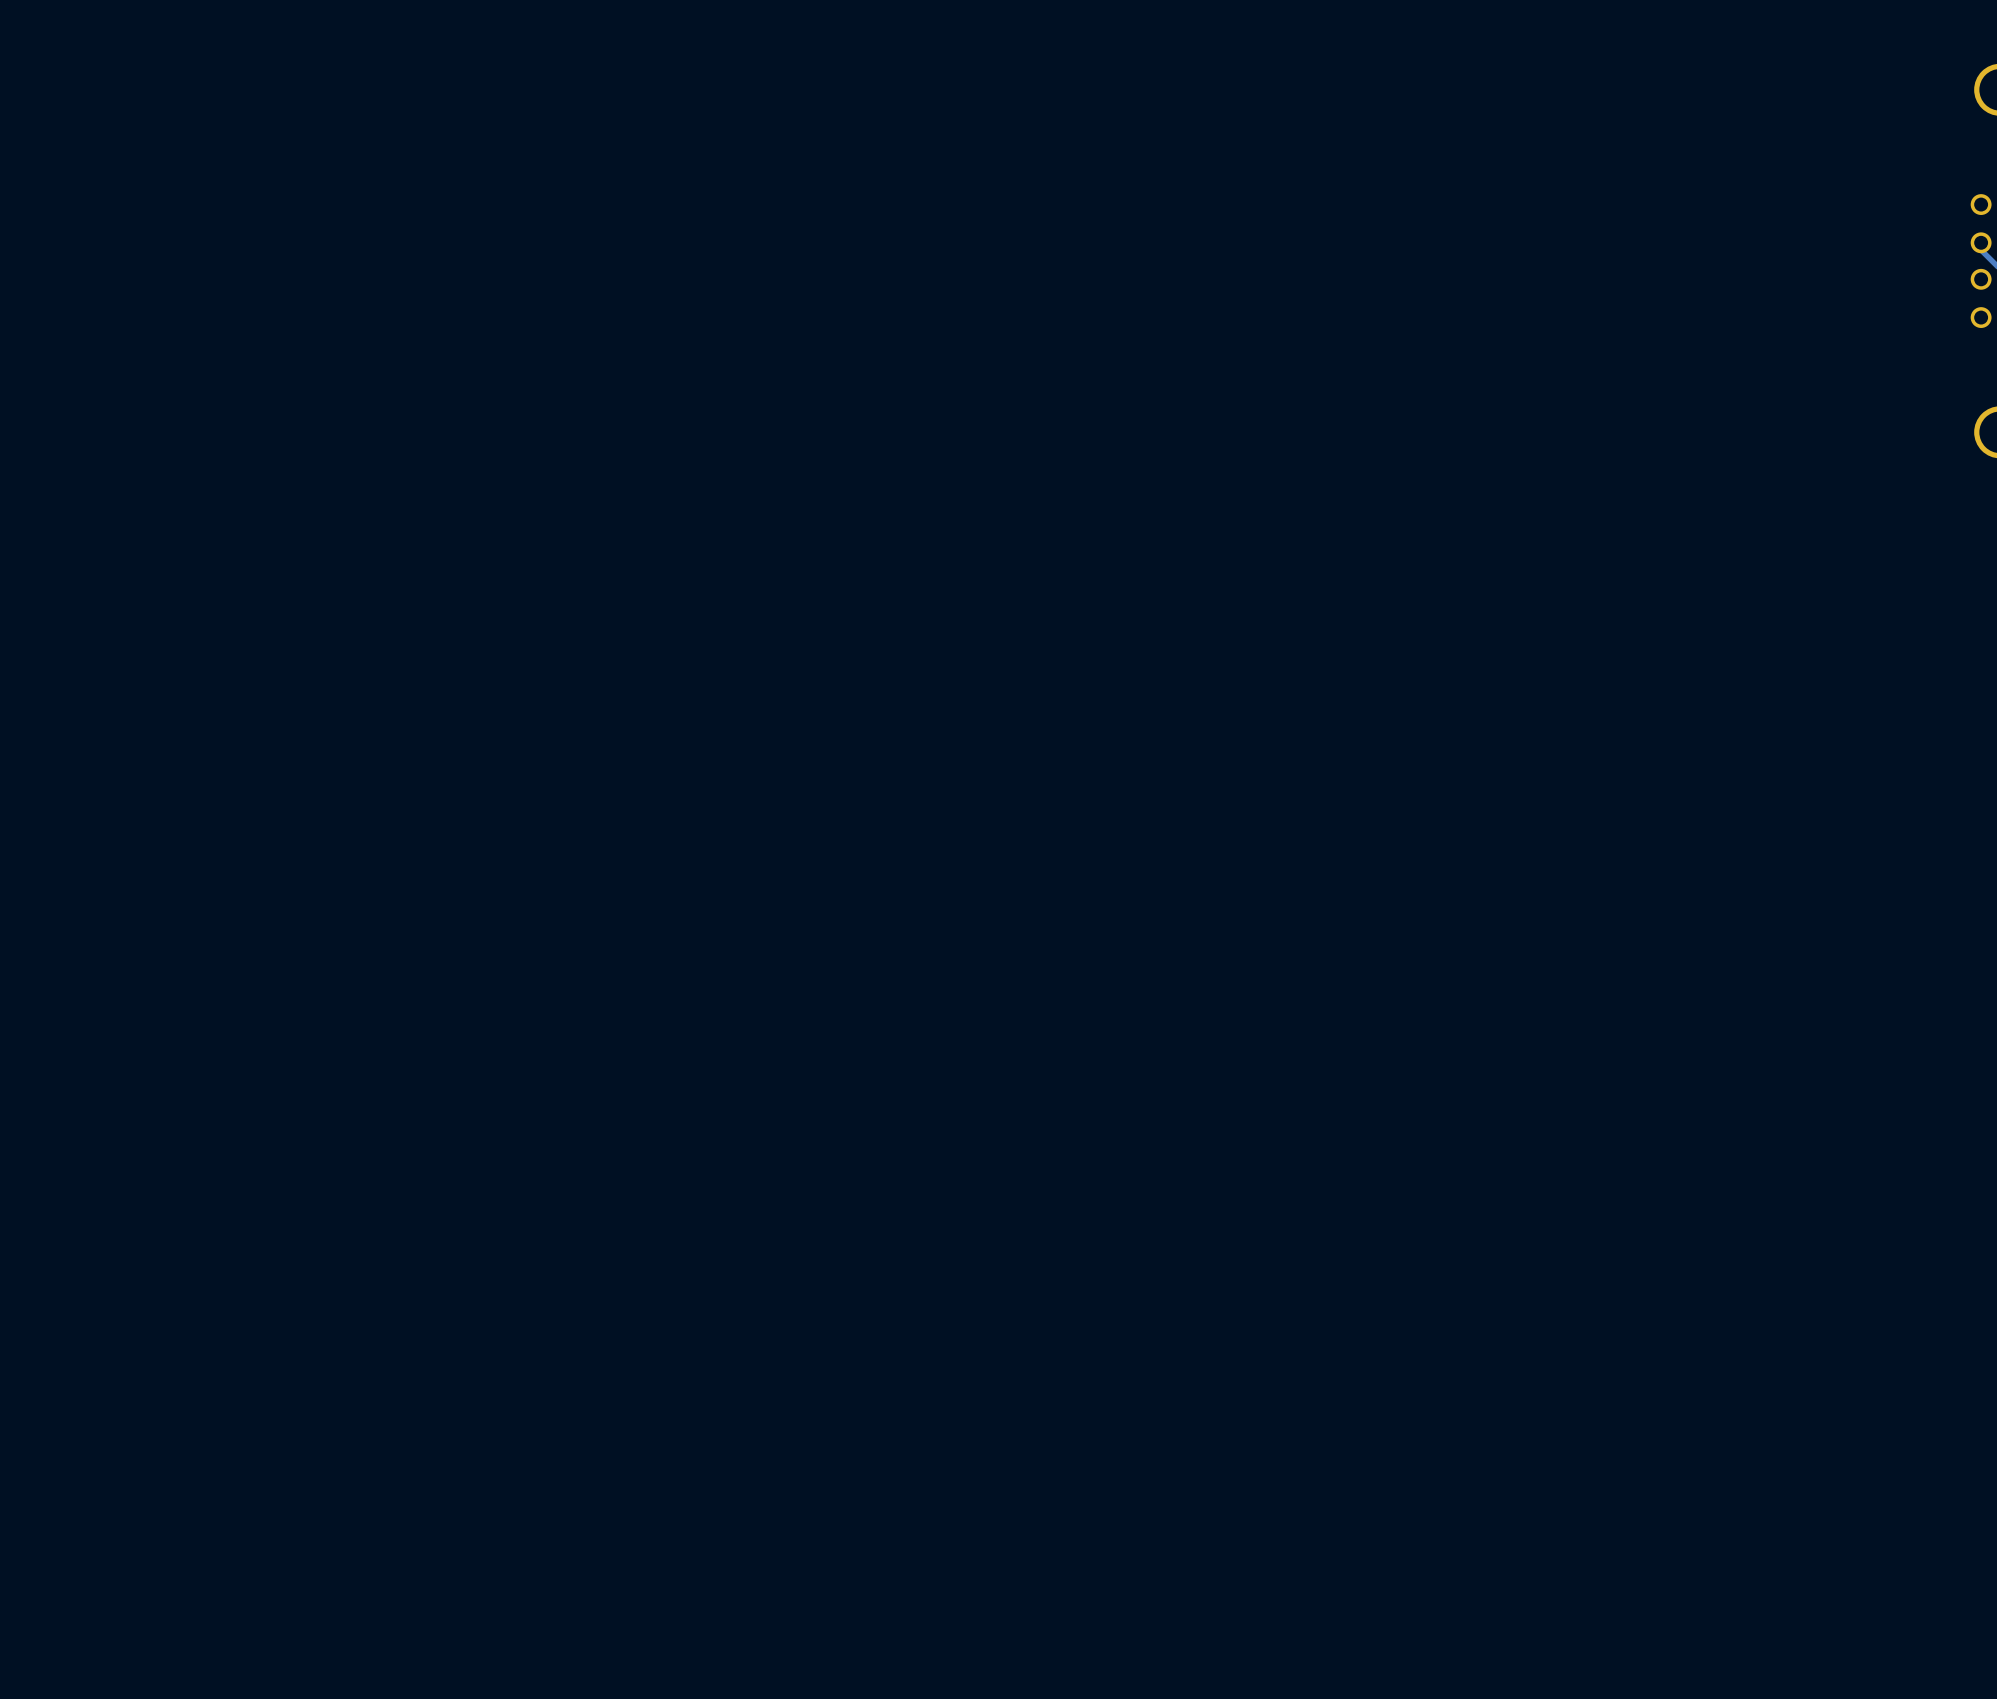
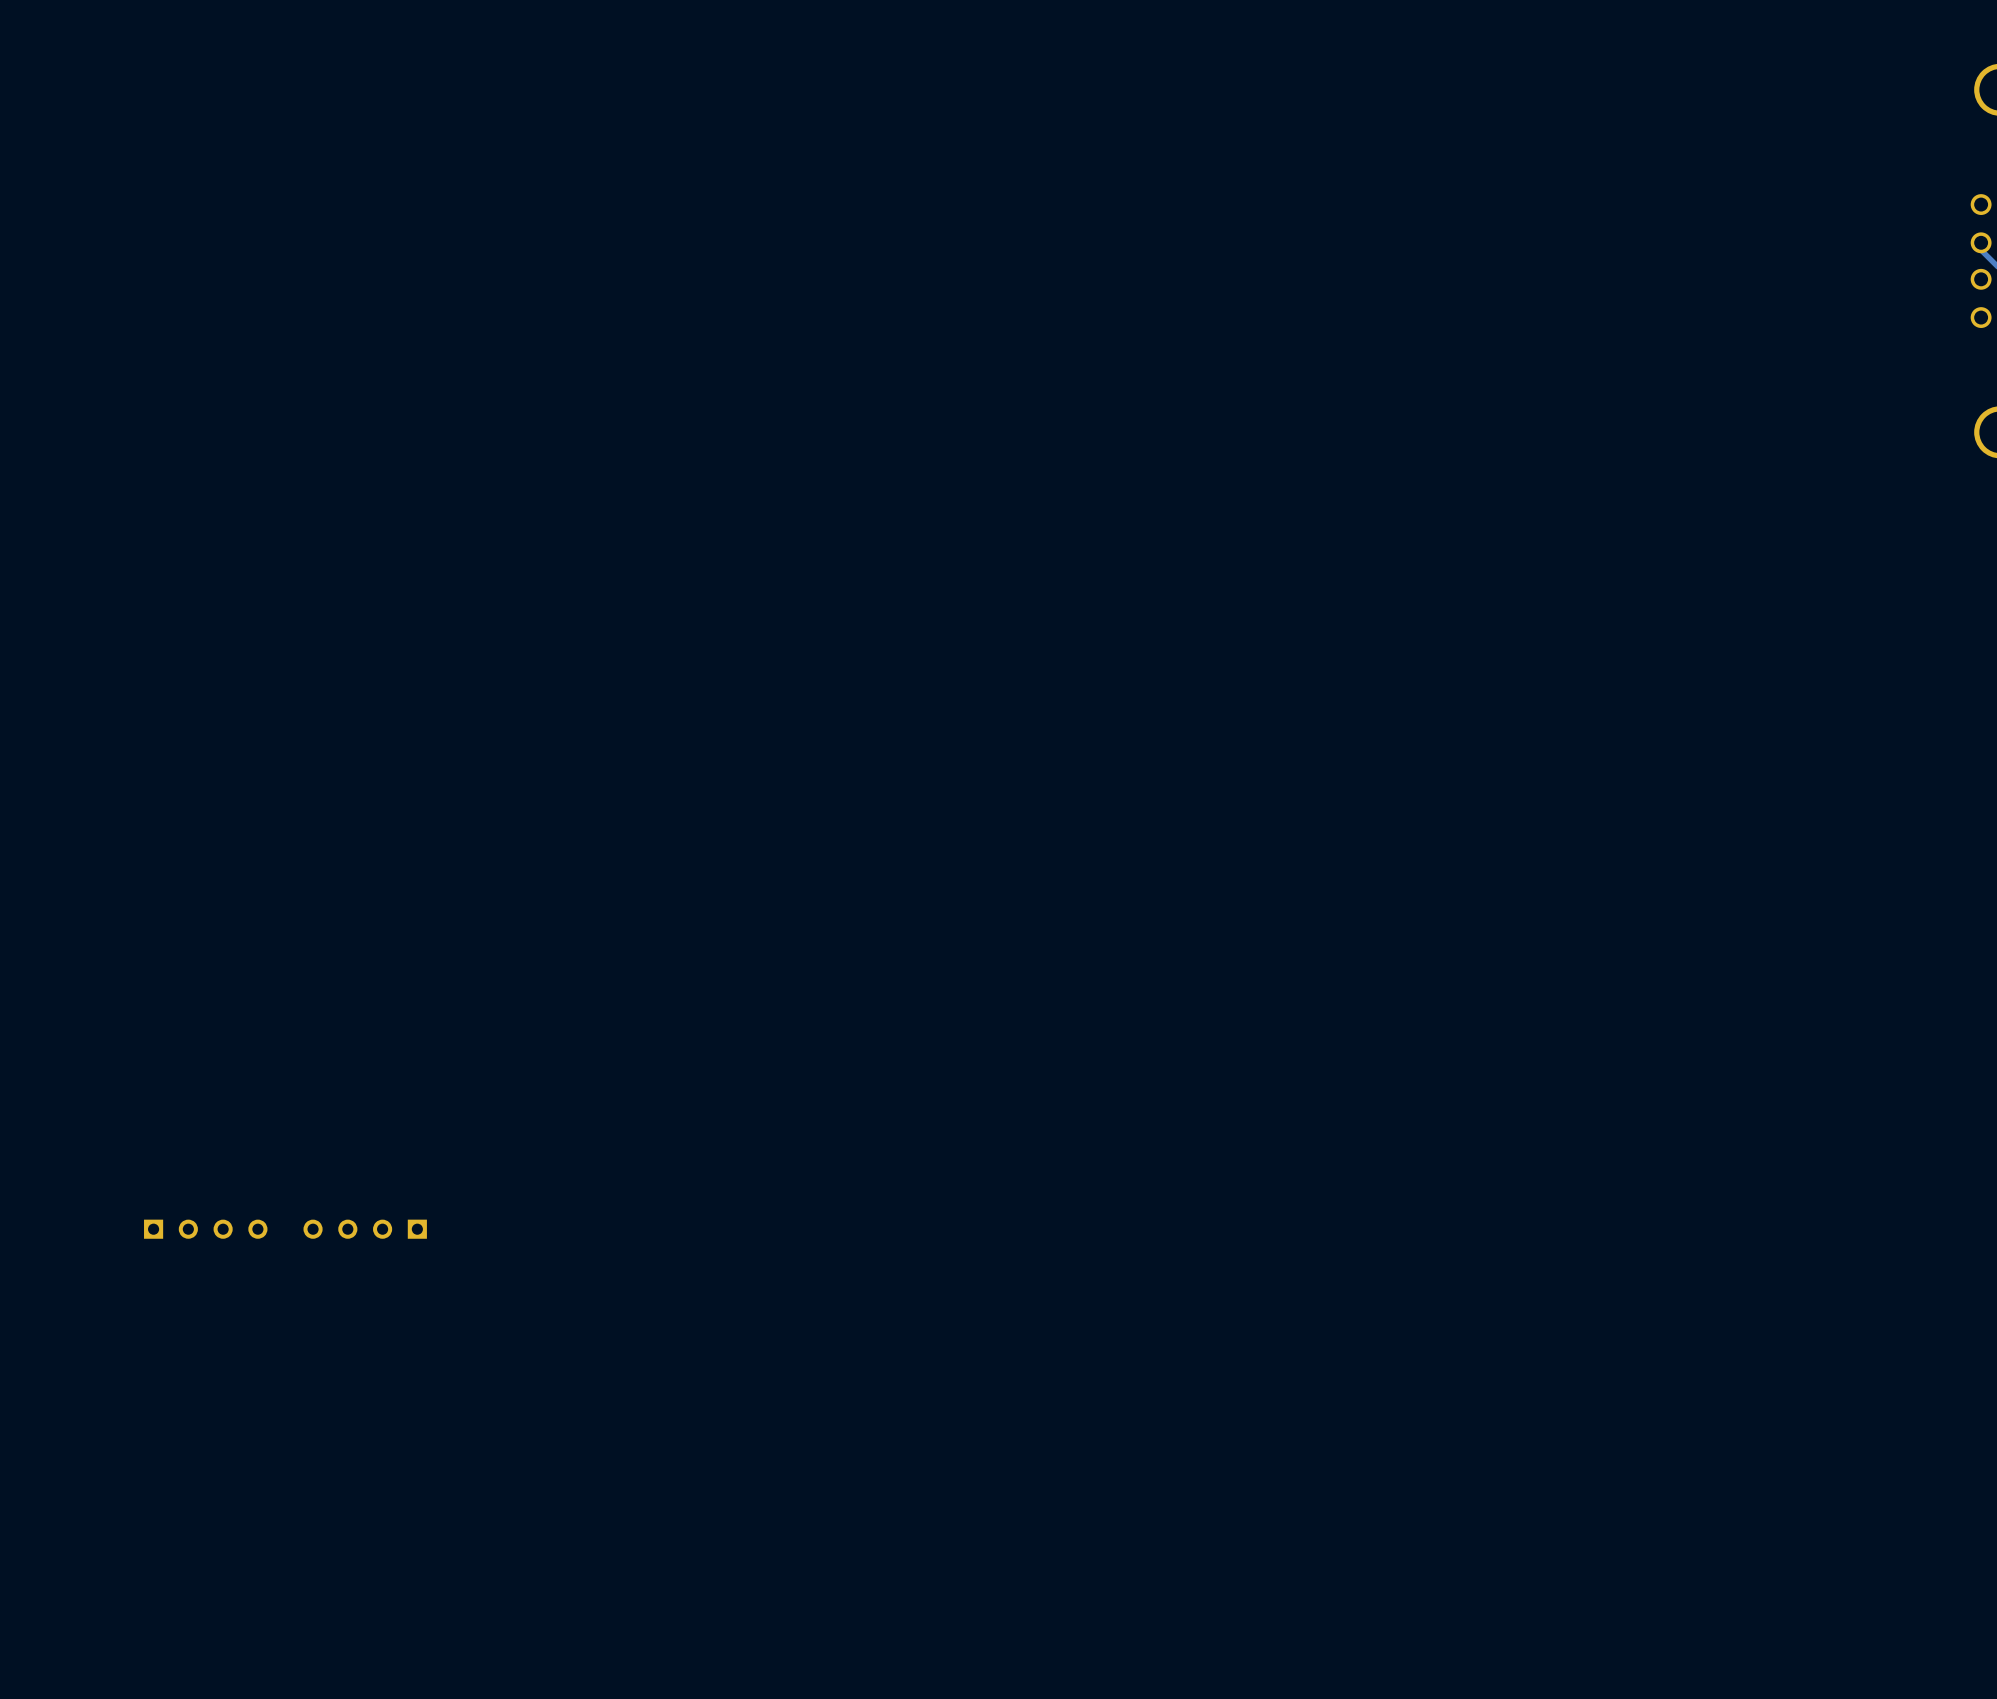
part: none -> (205, 1229)
part: none -> (365, 1229)

